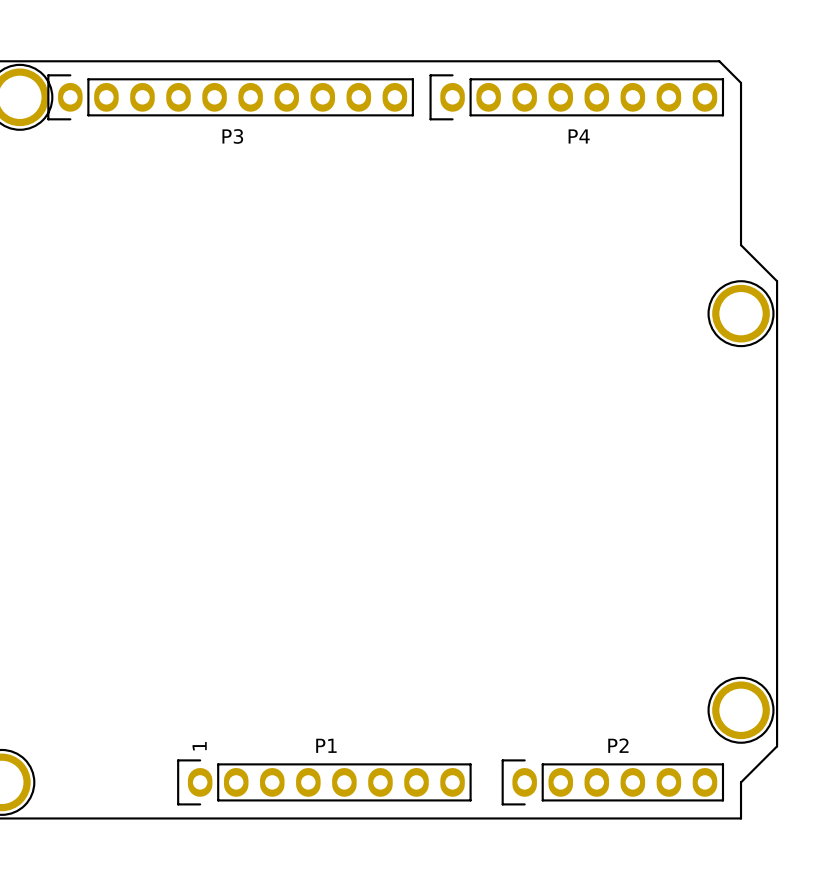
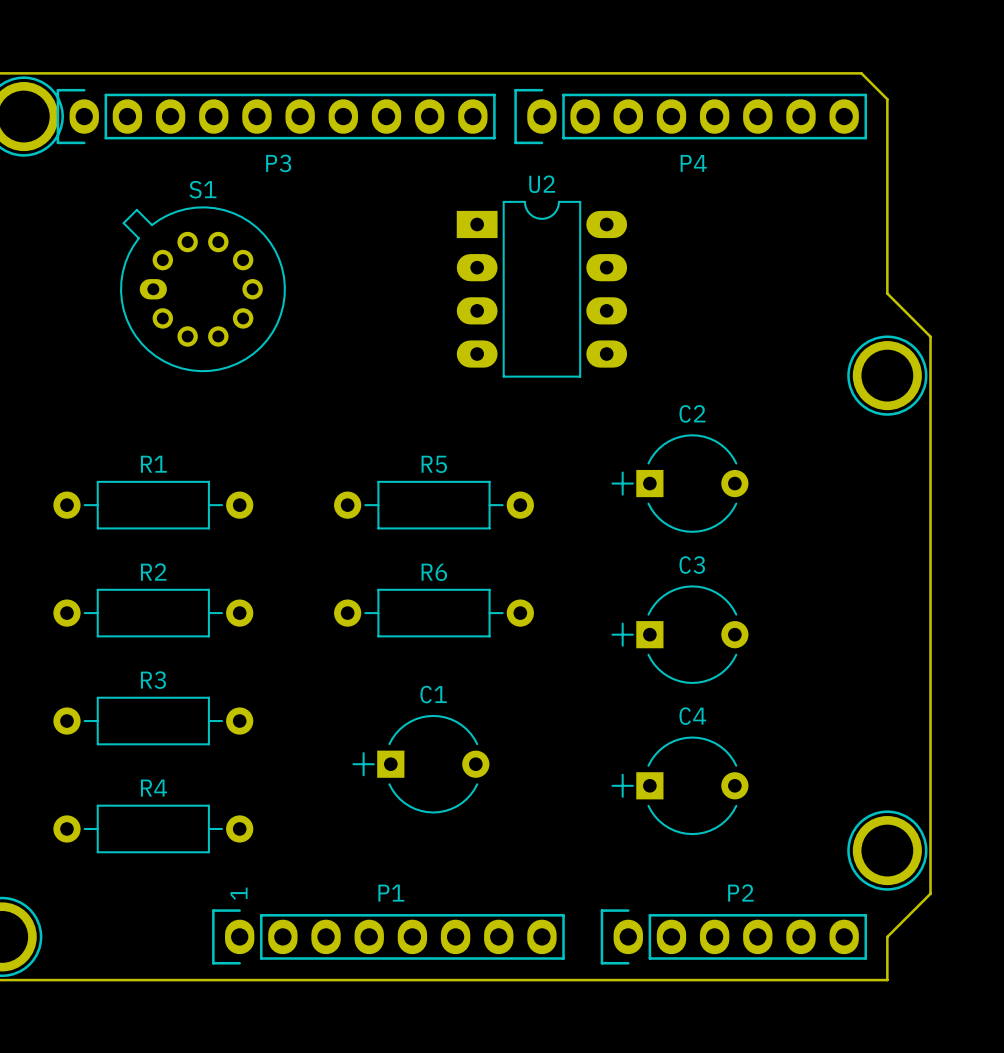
S1: none -> (202, 289)
U2: none -> (541, 289)
C2: none -> (679, 483)
R1: none -> (153, 505)
R5: none -> (433, 505)
R2: none -> (153, 613)
R6: none -> (433, 613)
C3: none -> (679, 634)
R3: none -> (153, 721)
C1: none -> (420, 764)
C4: none -> (679, 785)
R4: none -> (153, 828)

